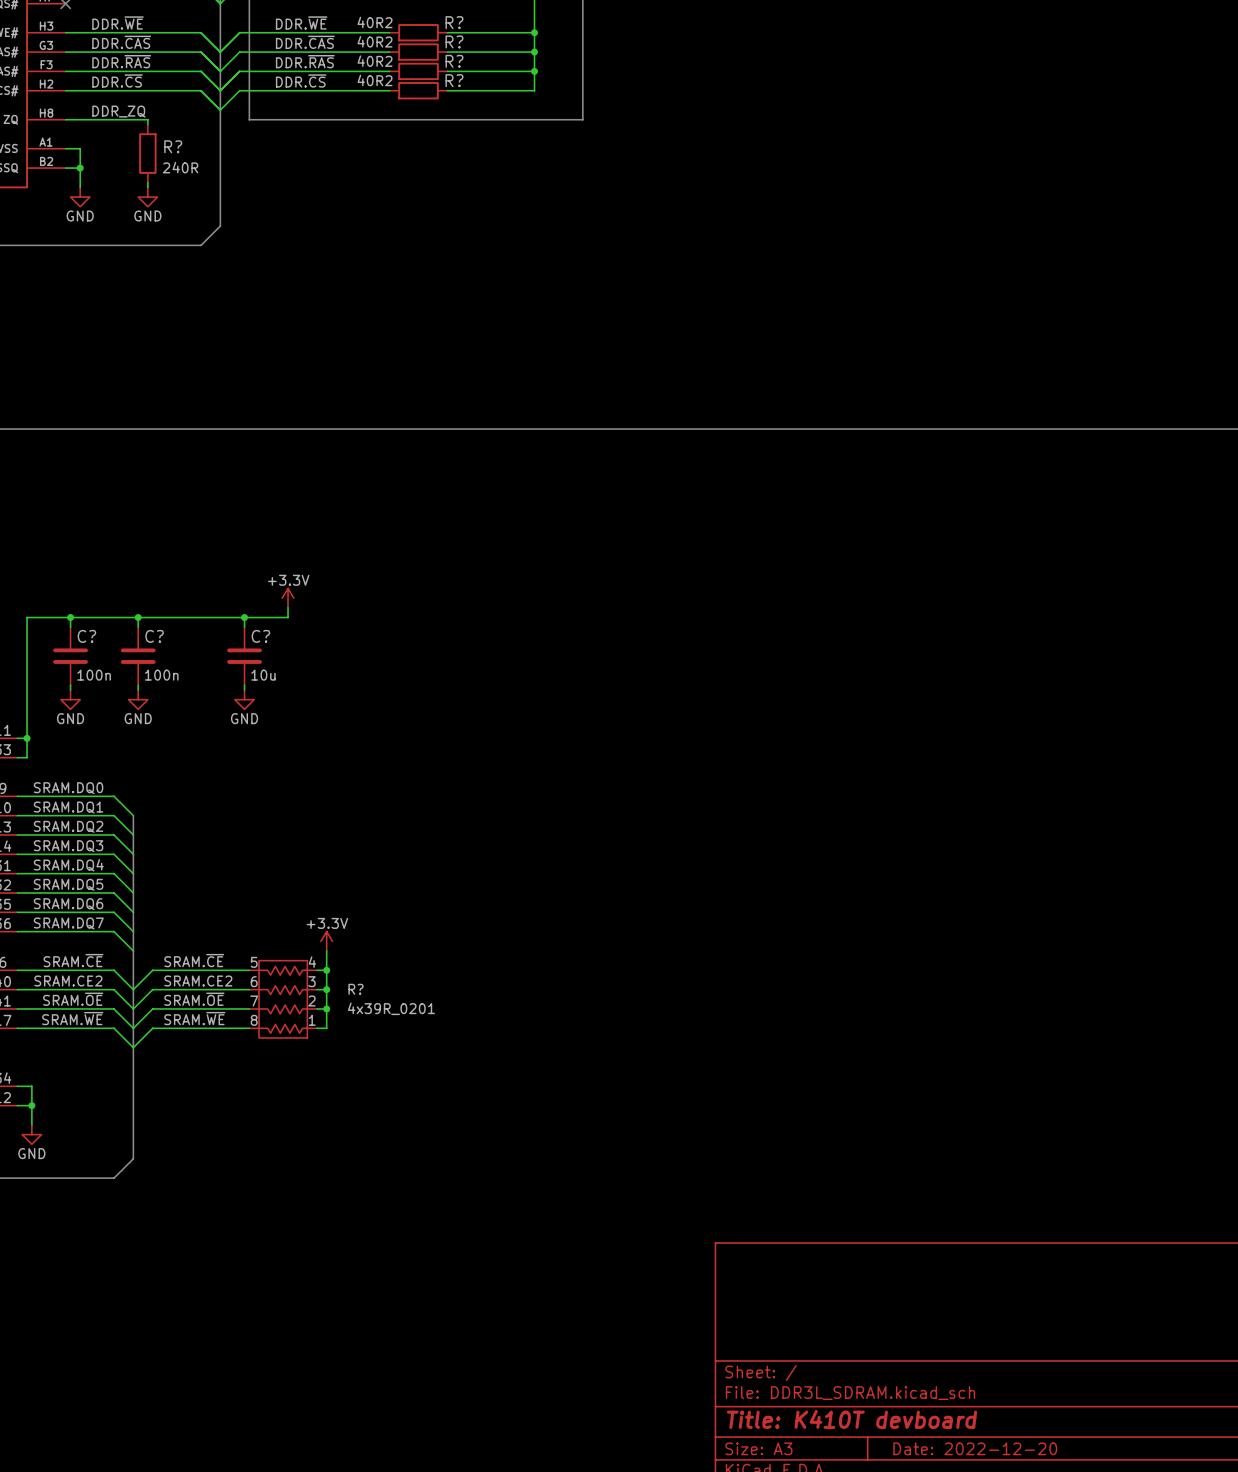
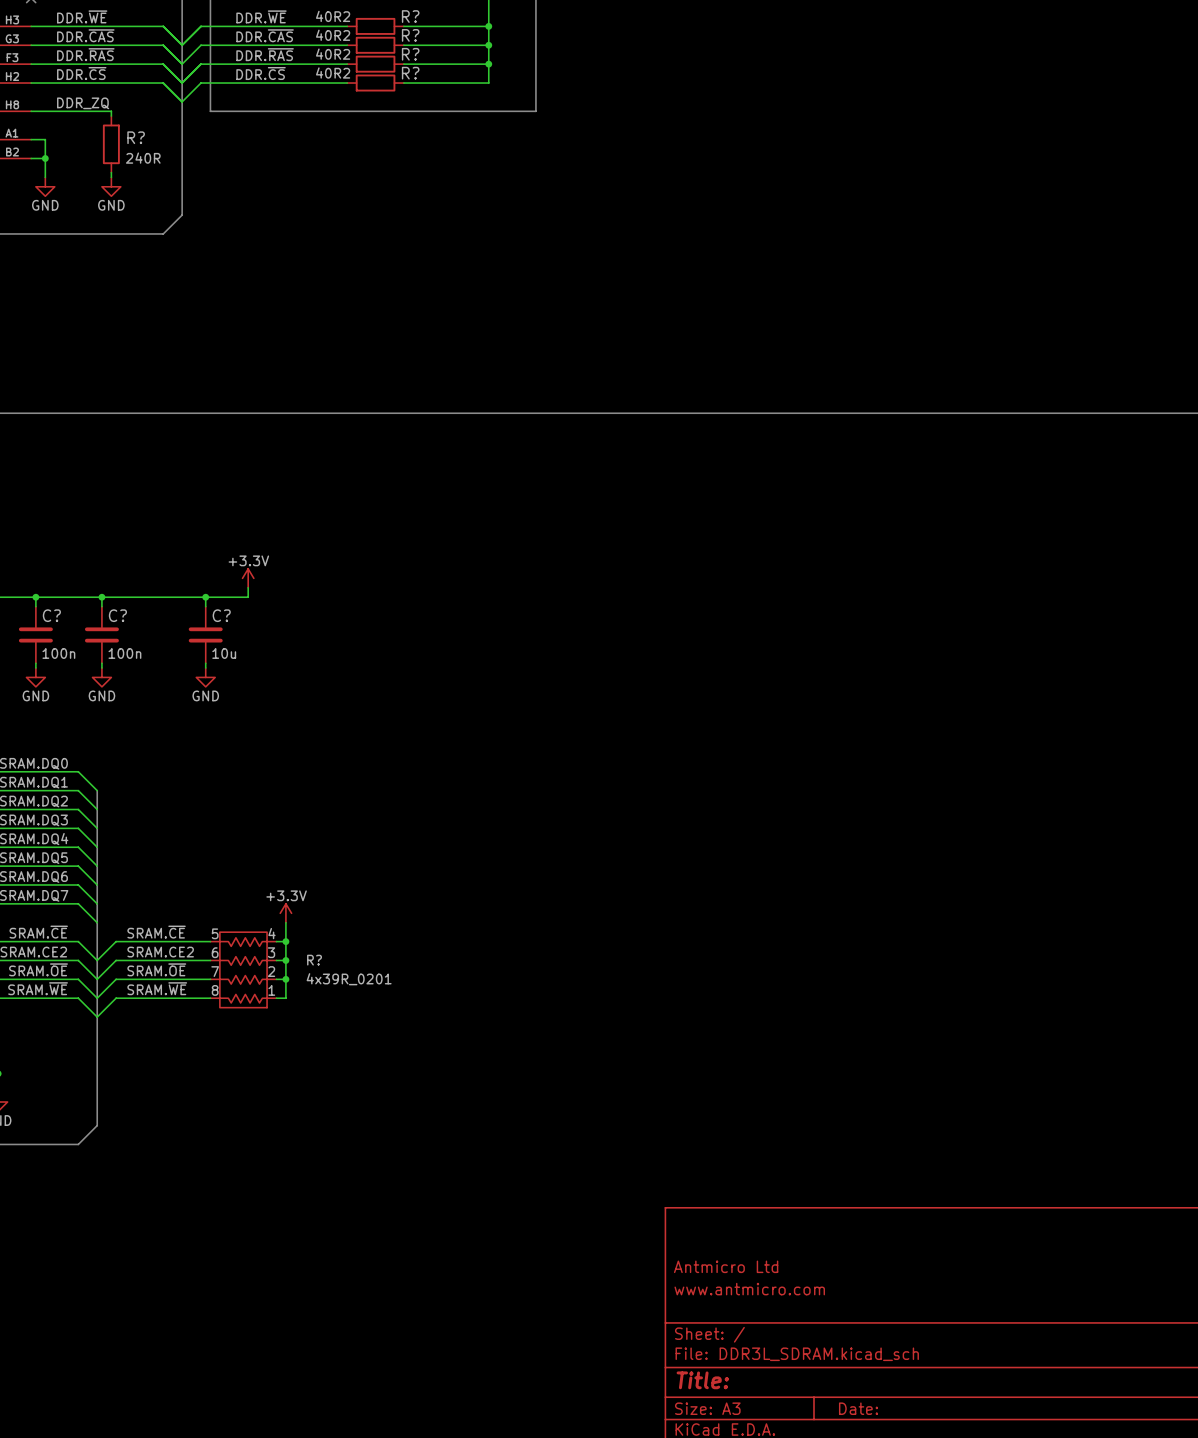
title block: none -> Antmicro Ltd (726, 1266)
title block: none -> www.antmicro.com (749, 1289)
title block: Title: K410T devboard (852, 1419) -> Title: (702, 1380)
title block: Date: 2022-12-20 (975, 1448) -> Date: (858, 1408)

